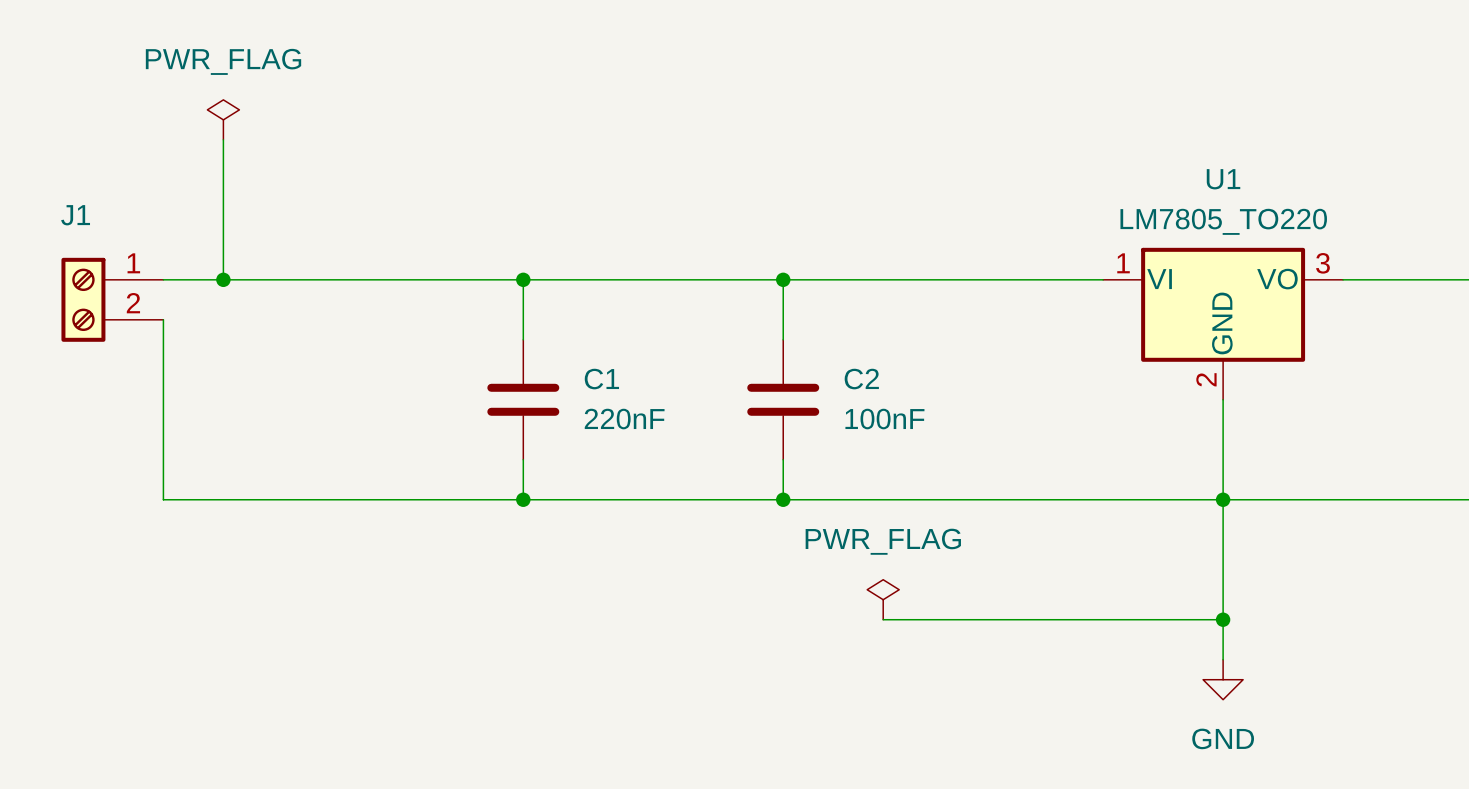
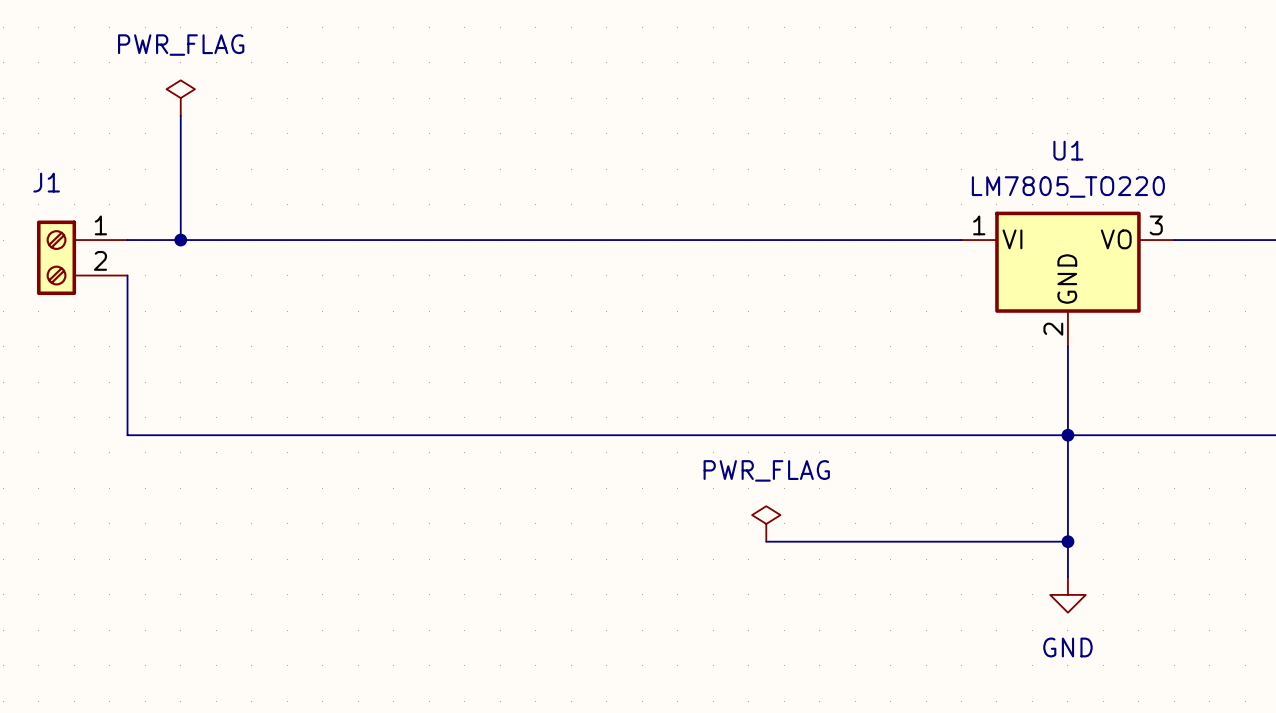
wire: (523, 279) (523, 339) -> none
junction: (523, 279) -> none
wire: (783, 279) (783, 339) -> none
junction: (783, 279) -> none
C1: 220nF (523, 399) -> none
C2: 100nF (783, 399) -> none
wire: (523, 459) (523, 499) -> none
wire: (783, 459) (783, 499) -> none
junction: (523, 499) -> none
junction: (783, 499) -> none

